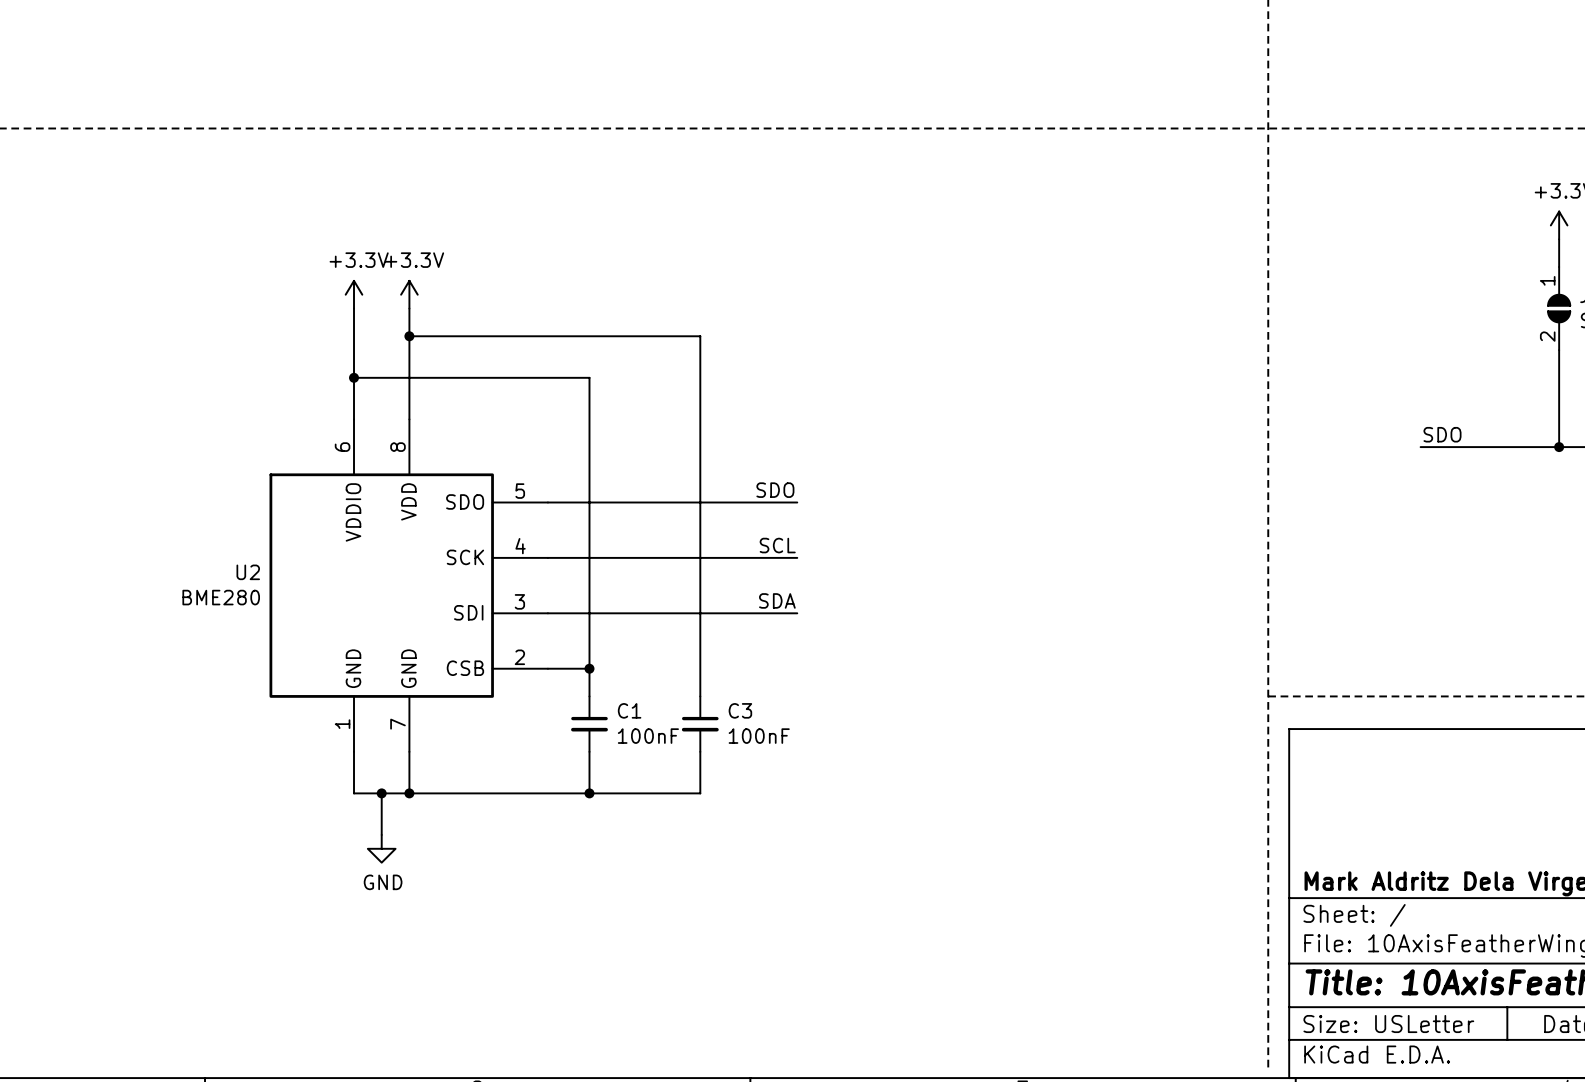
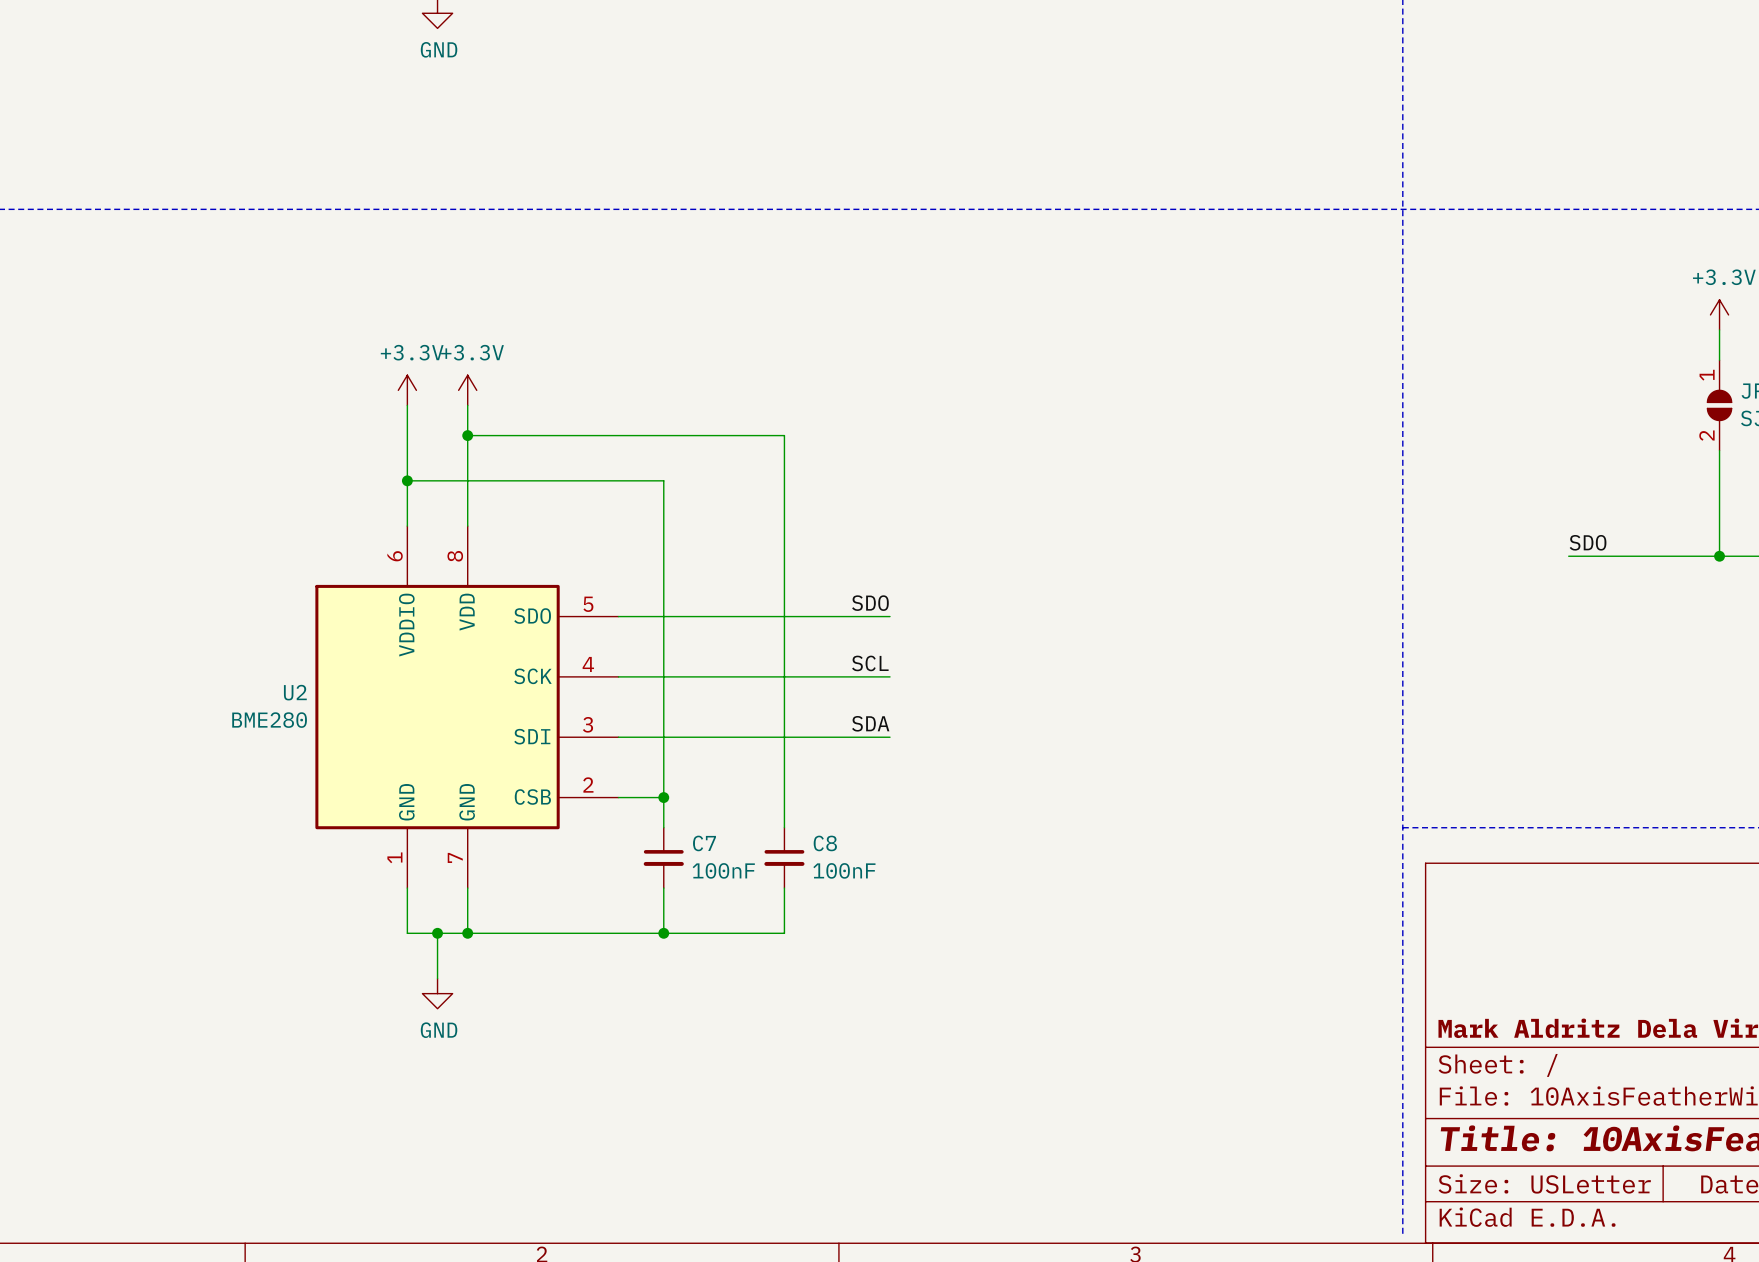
C1 name: C1 (629, 710) -> C7 (704, 843)
C3 name: C3 (740, 710) -> C8 (825, 843)

